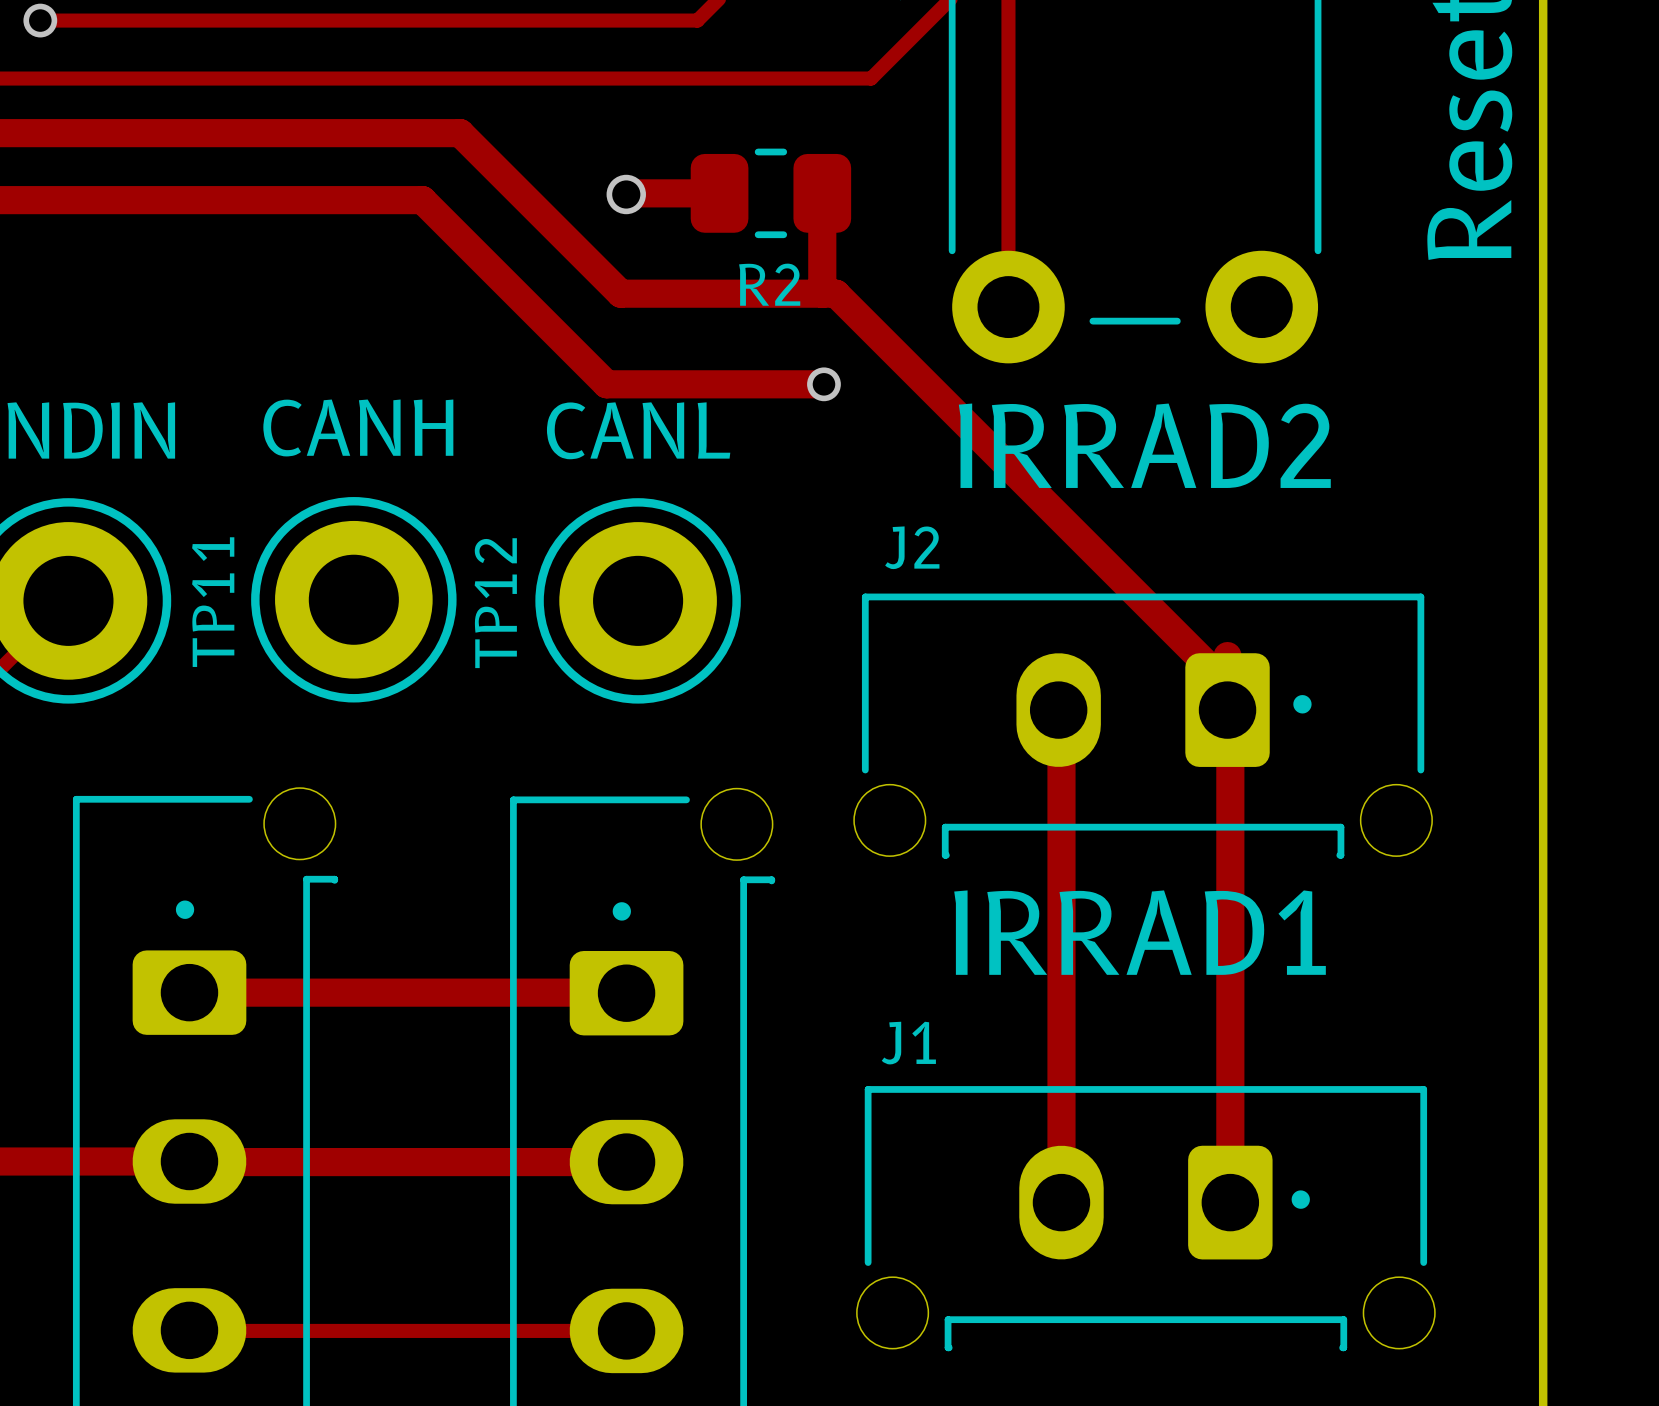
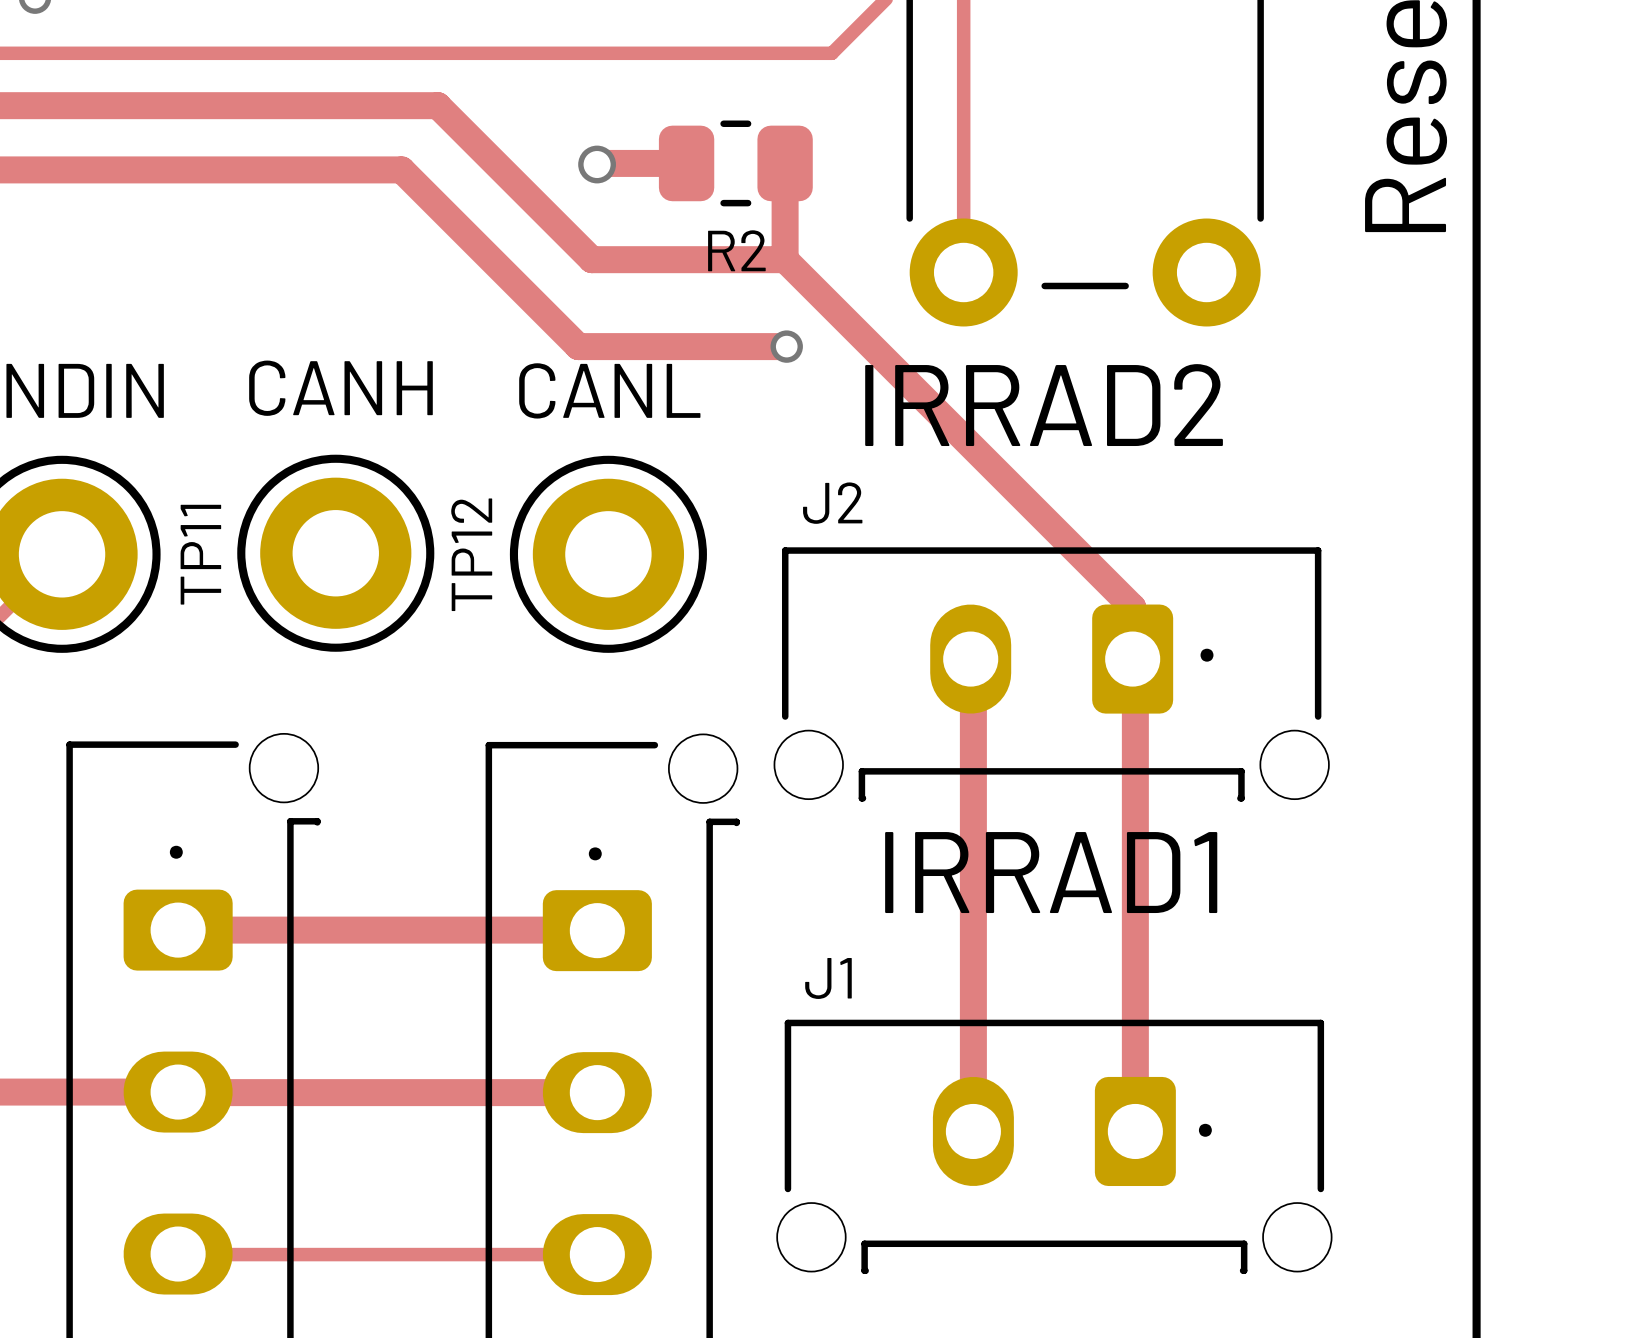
track: (822, 293) (836, 293) (1227, 685) -> (785, 259) (1132, 607) (1132, 659) (1135, 661) (1135, 1131)
text position: IRRAD2 (1144, 445) -> IRRAD2 (1044, 405)
track: (1227, 656) (1227, 710) (1230, 712) (1230, 1202) -> none
text position: . (1302, 704) -> . (1207, 655)
track: (1058, 710) (1061, 712) (1061, 1202) -> (970, 659) (973, 661) (973, 1131)
J2 position: (1143, 726) -> (1051, 674)
text position: IRRAD1 (1140, 932) -> IRRAD1 (1051, 872)
text position: . (1300, 1199) -> . (1205, 1130)
J1 position: (1145, 1218) -> (1054, 1146)

